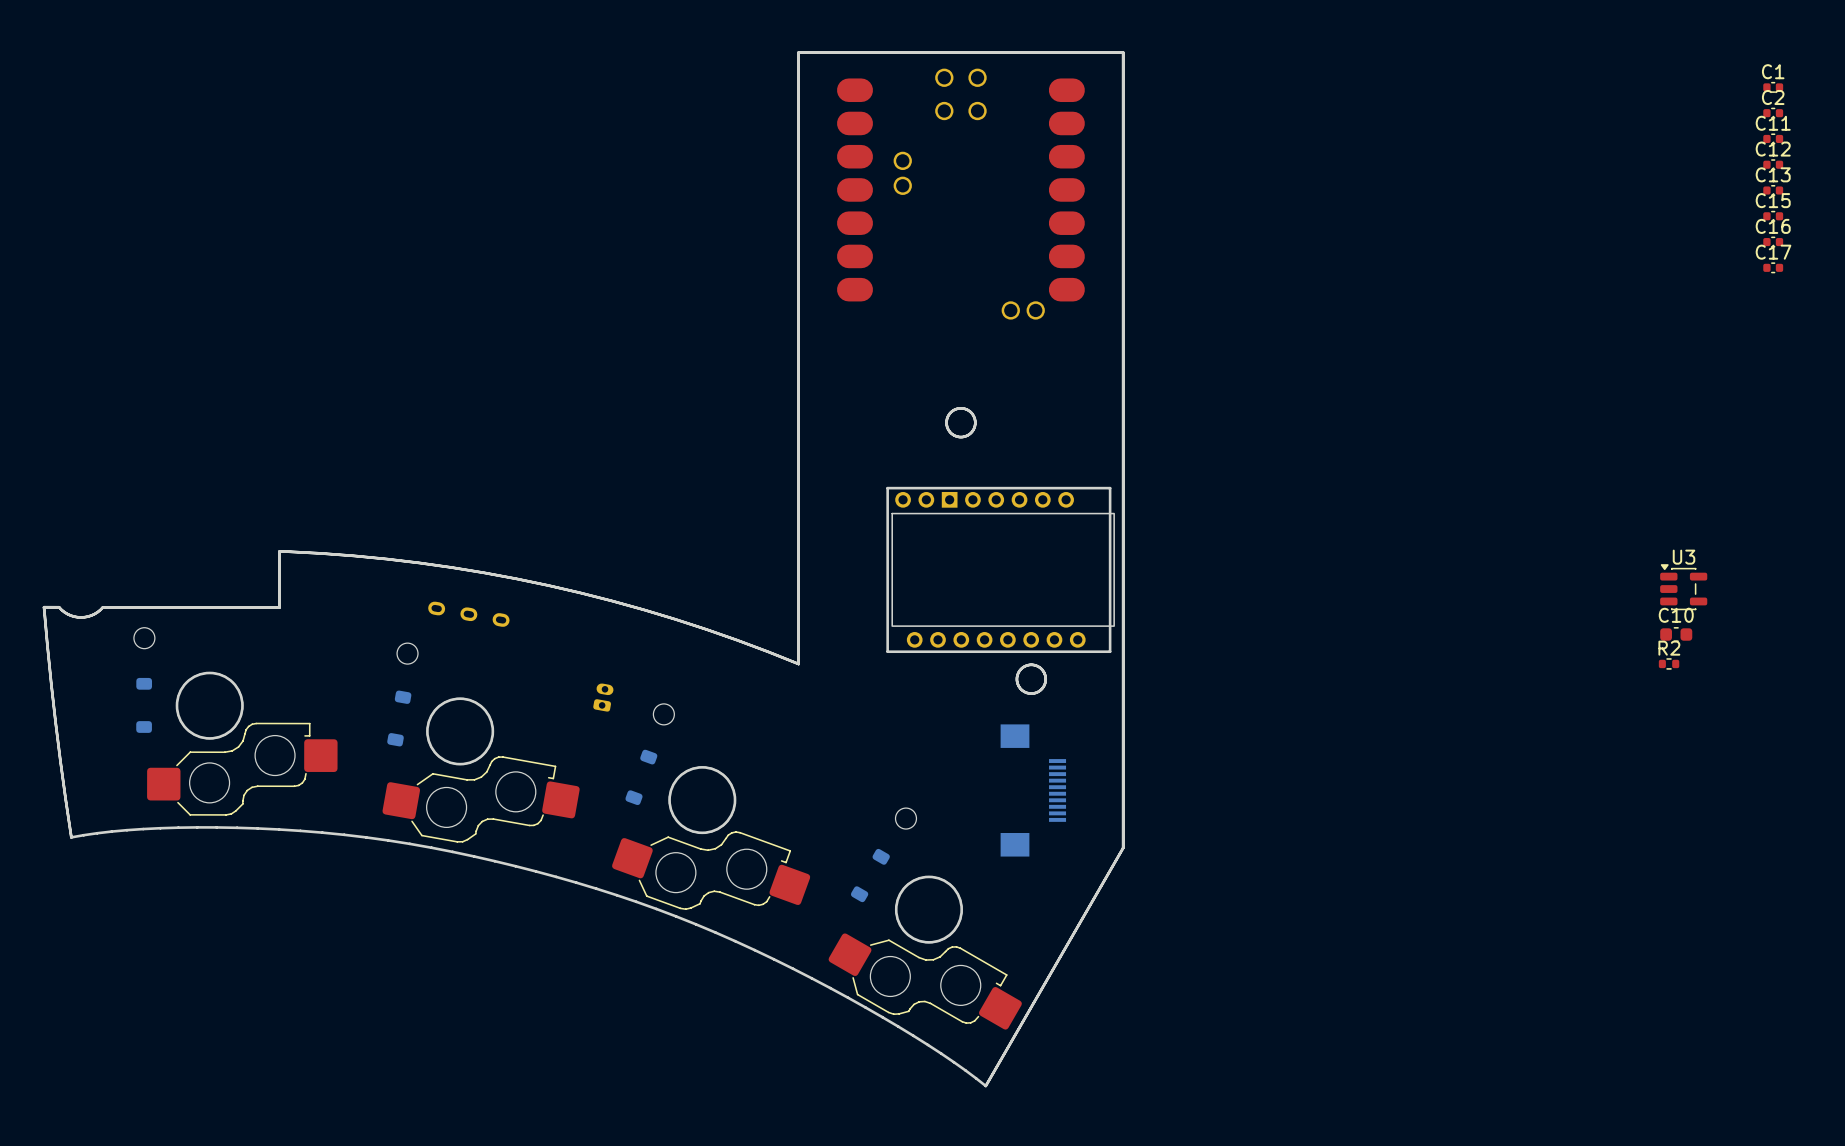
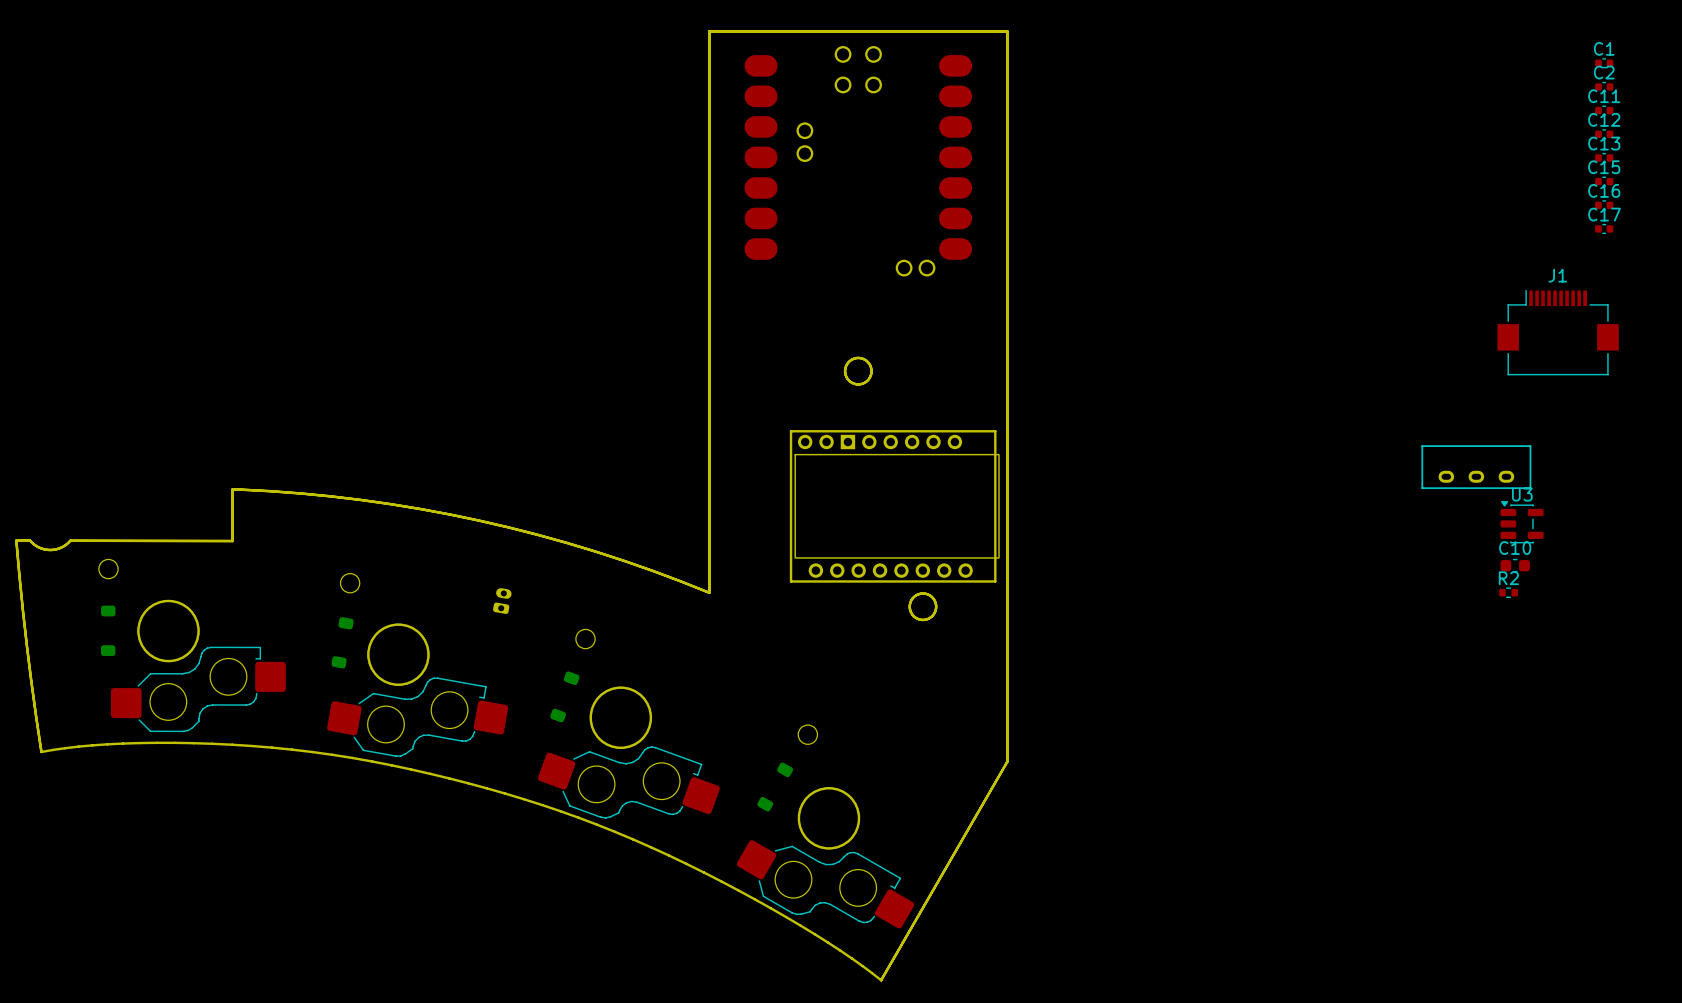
J1: none -> (1558, 332)
part: none -> (1476, 467)
part: (468, 614) -> none
part position: (603, 697) -> (502, 601)
part: (1033, 790) -> none

